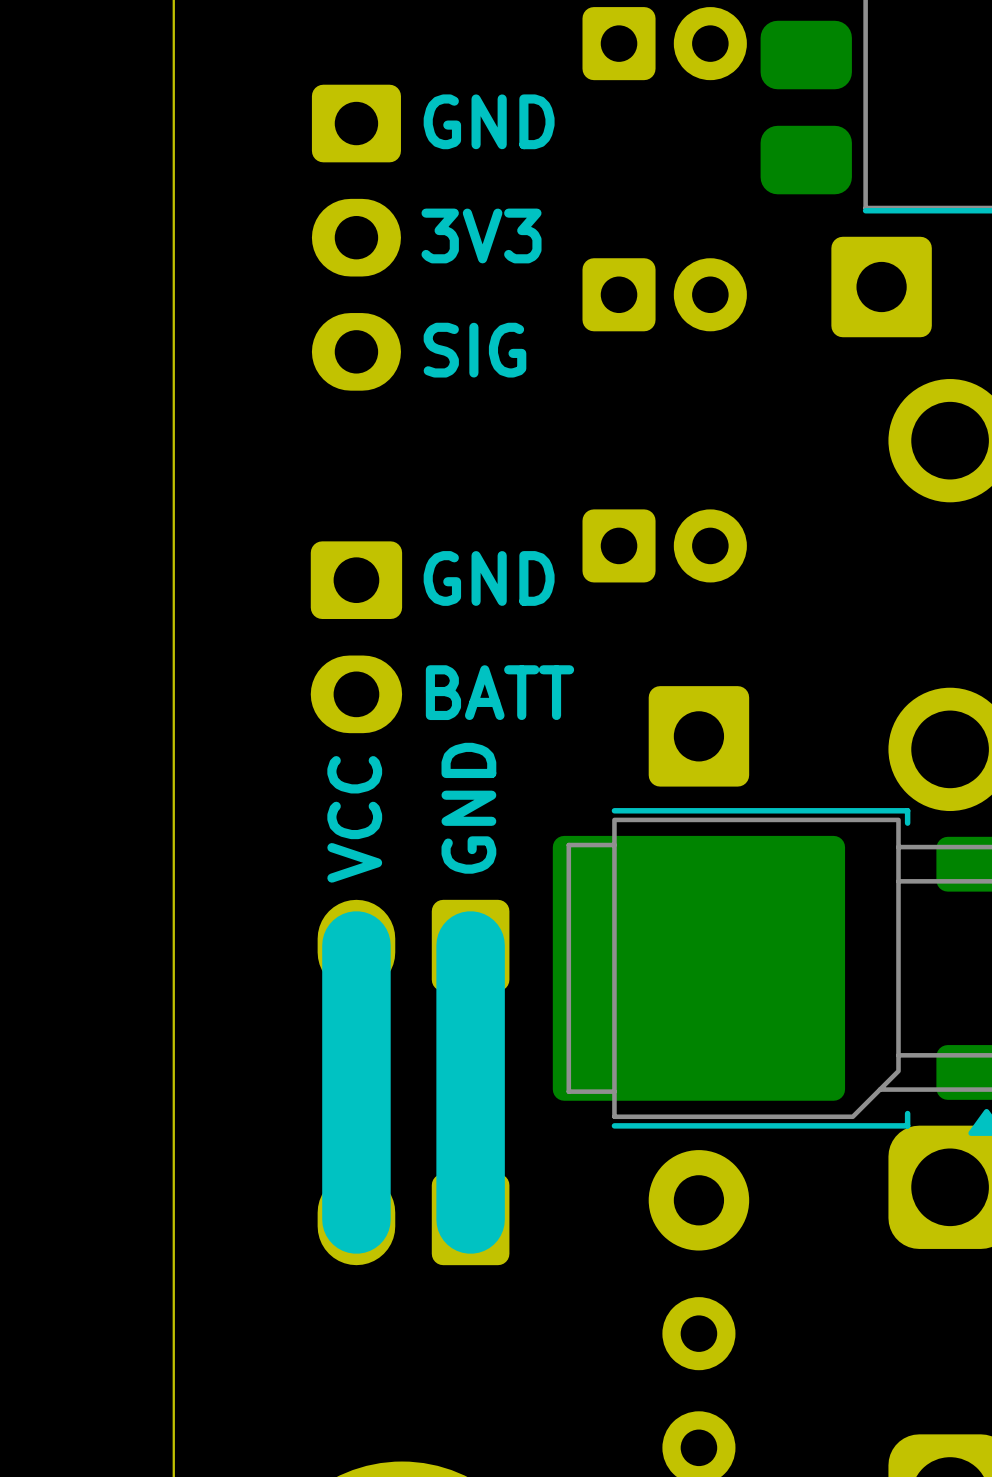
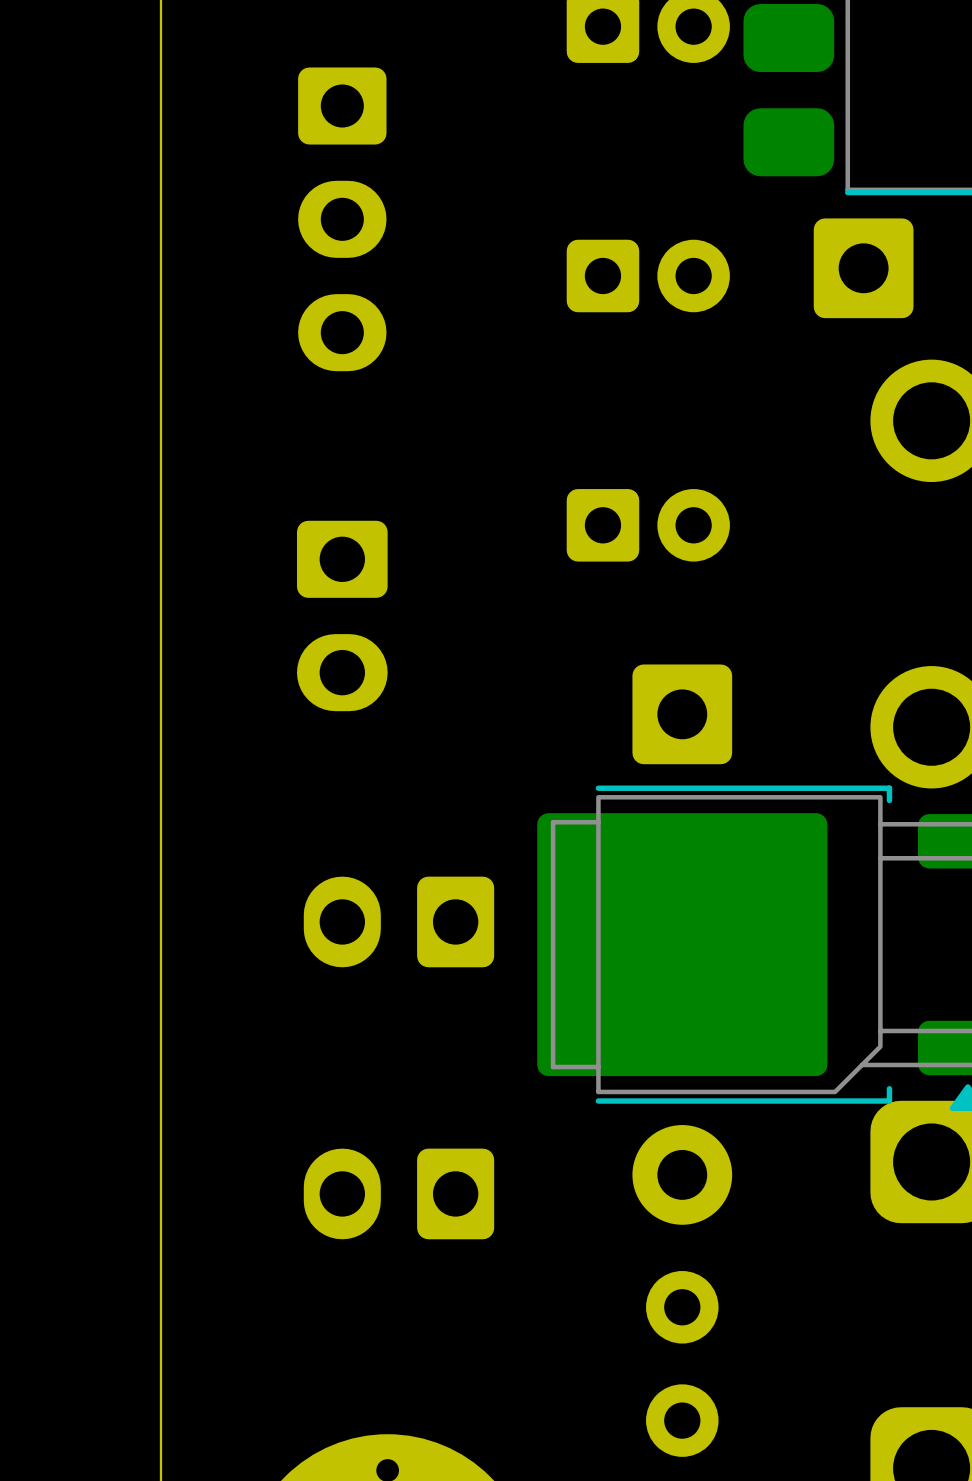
text: GND (489, 121) -> none
text: 3V3 (481, 235) -> none
text: SIG (474, 350) -> none
text: GND (489, 578) -> none
text: BATT (499, 692) -> none
text: GND (468, 808) -> none
text: VCC (354, 819) -> none
line: (356, 945) (356, 1219) -> none
line: (470, 945) (470, 1219) -> none

